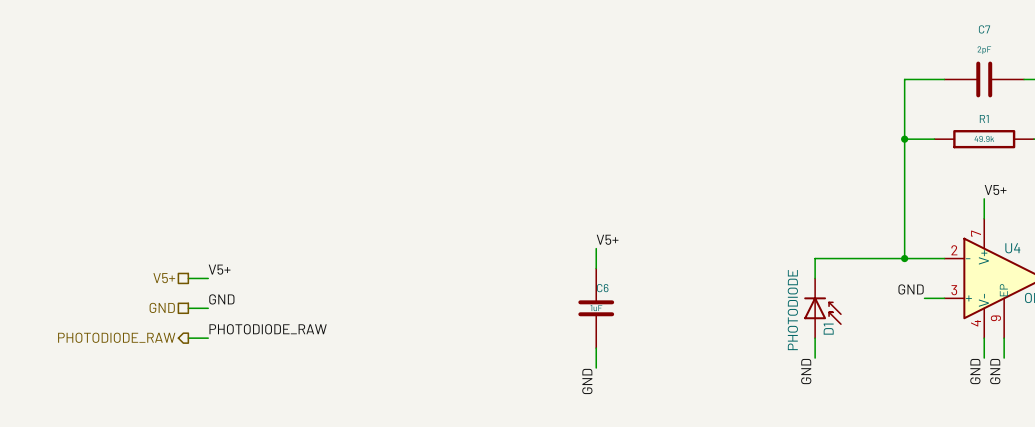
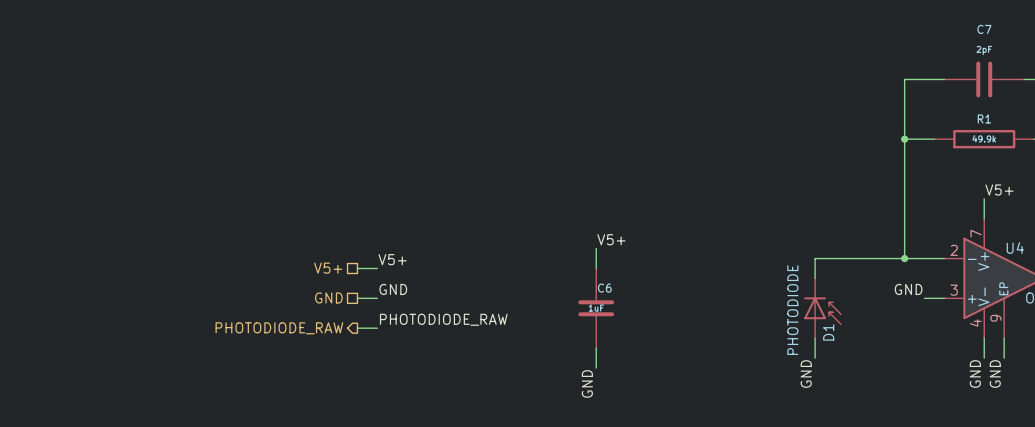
label position: V5+ (219, 269) -> V5+ (392, 259)
hierarchical label position: V5+ (164, 278) -> V5+ (328, 268)
wire: (188, 278) (208, 278) -> (357, 268) (377, 268)
label position: GND (221, 299) -> GND (393, 289)
hierarchical label position: GND (162, 307) -> GND (328, 297)
wire: (188, 308) (208, 308) -> (357, 298) (377, 298)
label position: PHOTODIODE_RAW (268, 329) -> PHOTODIODE_RAW (443, 319)
hierarchical label position: PHOTODIODE_RAW (116, 337) -> PHOTODIODE_RAW (279, 328)
wire: (188, 338) (208, 338) -> (357, 328) (377, 328)

